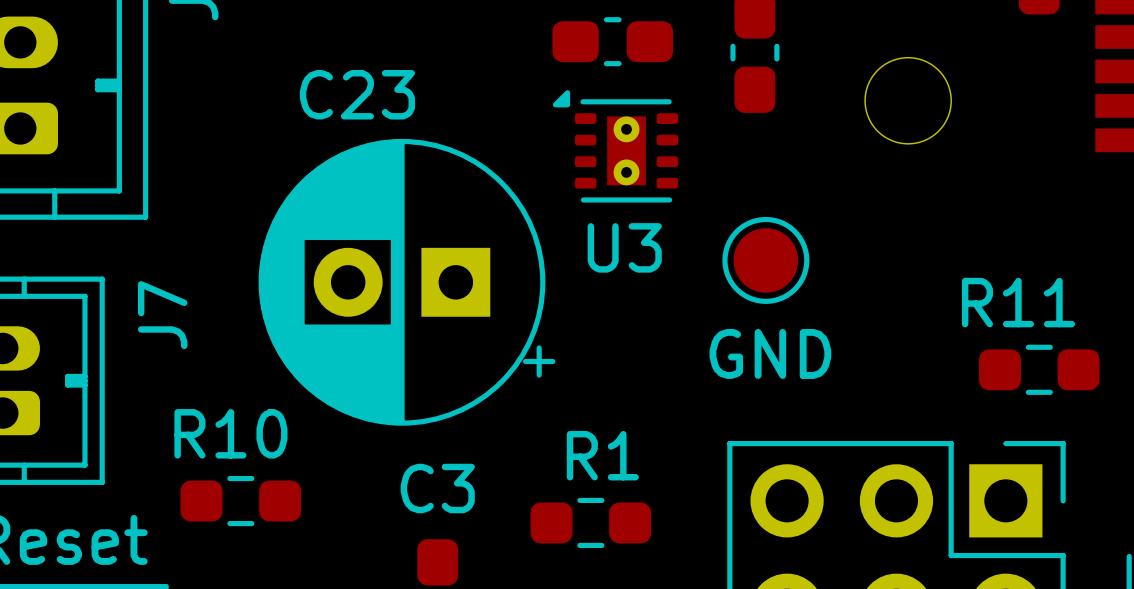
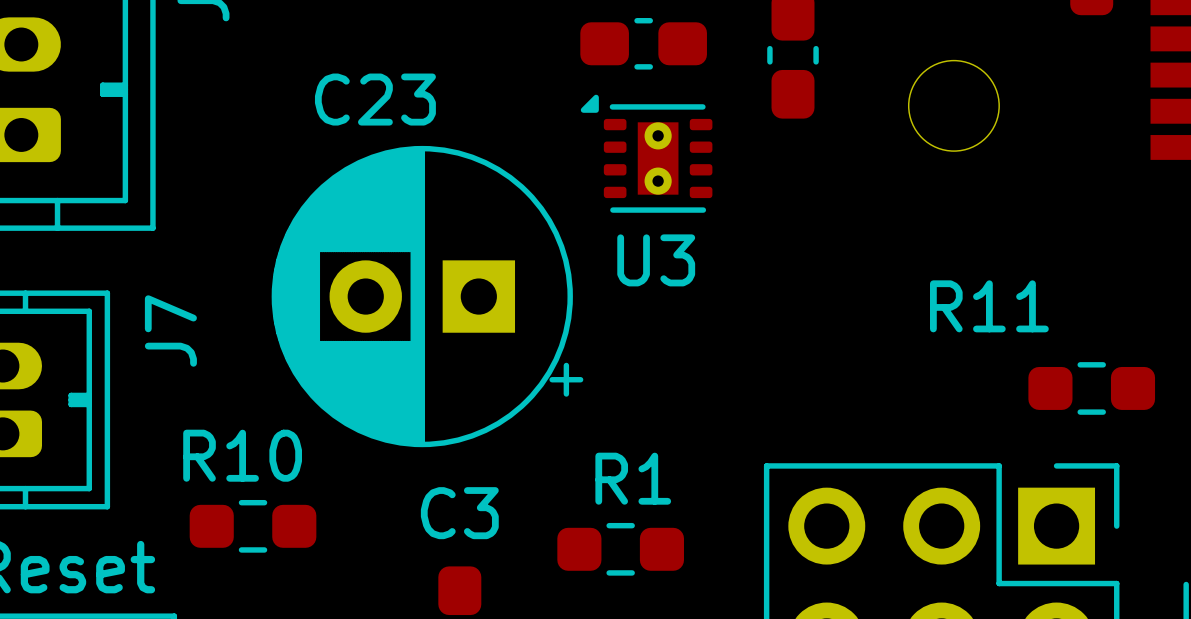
part: (765, 260) -> none
R11 name position: R11 (1018, 302) -> R11 (989, 306)
text: GND (770, 353) -> none

